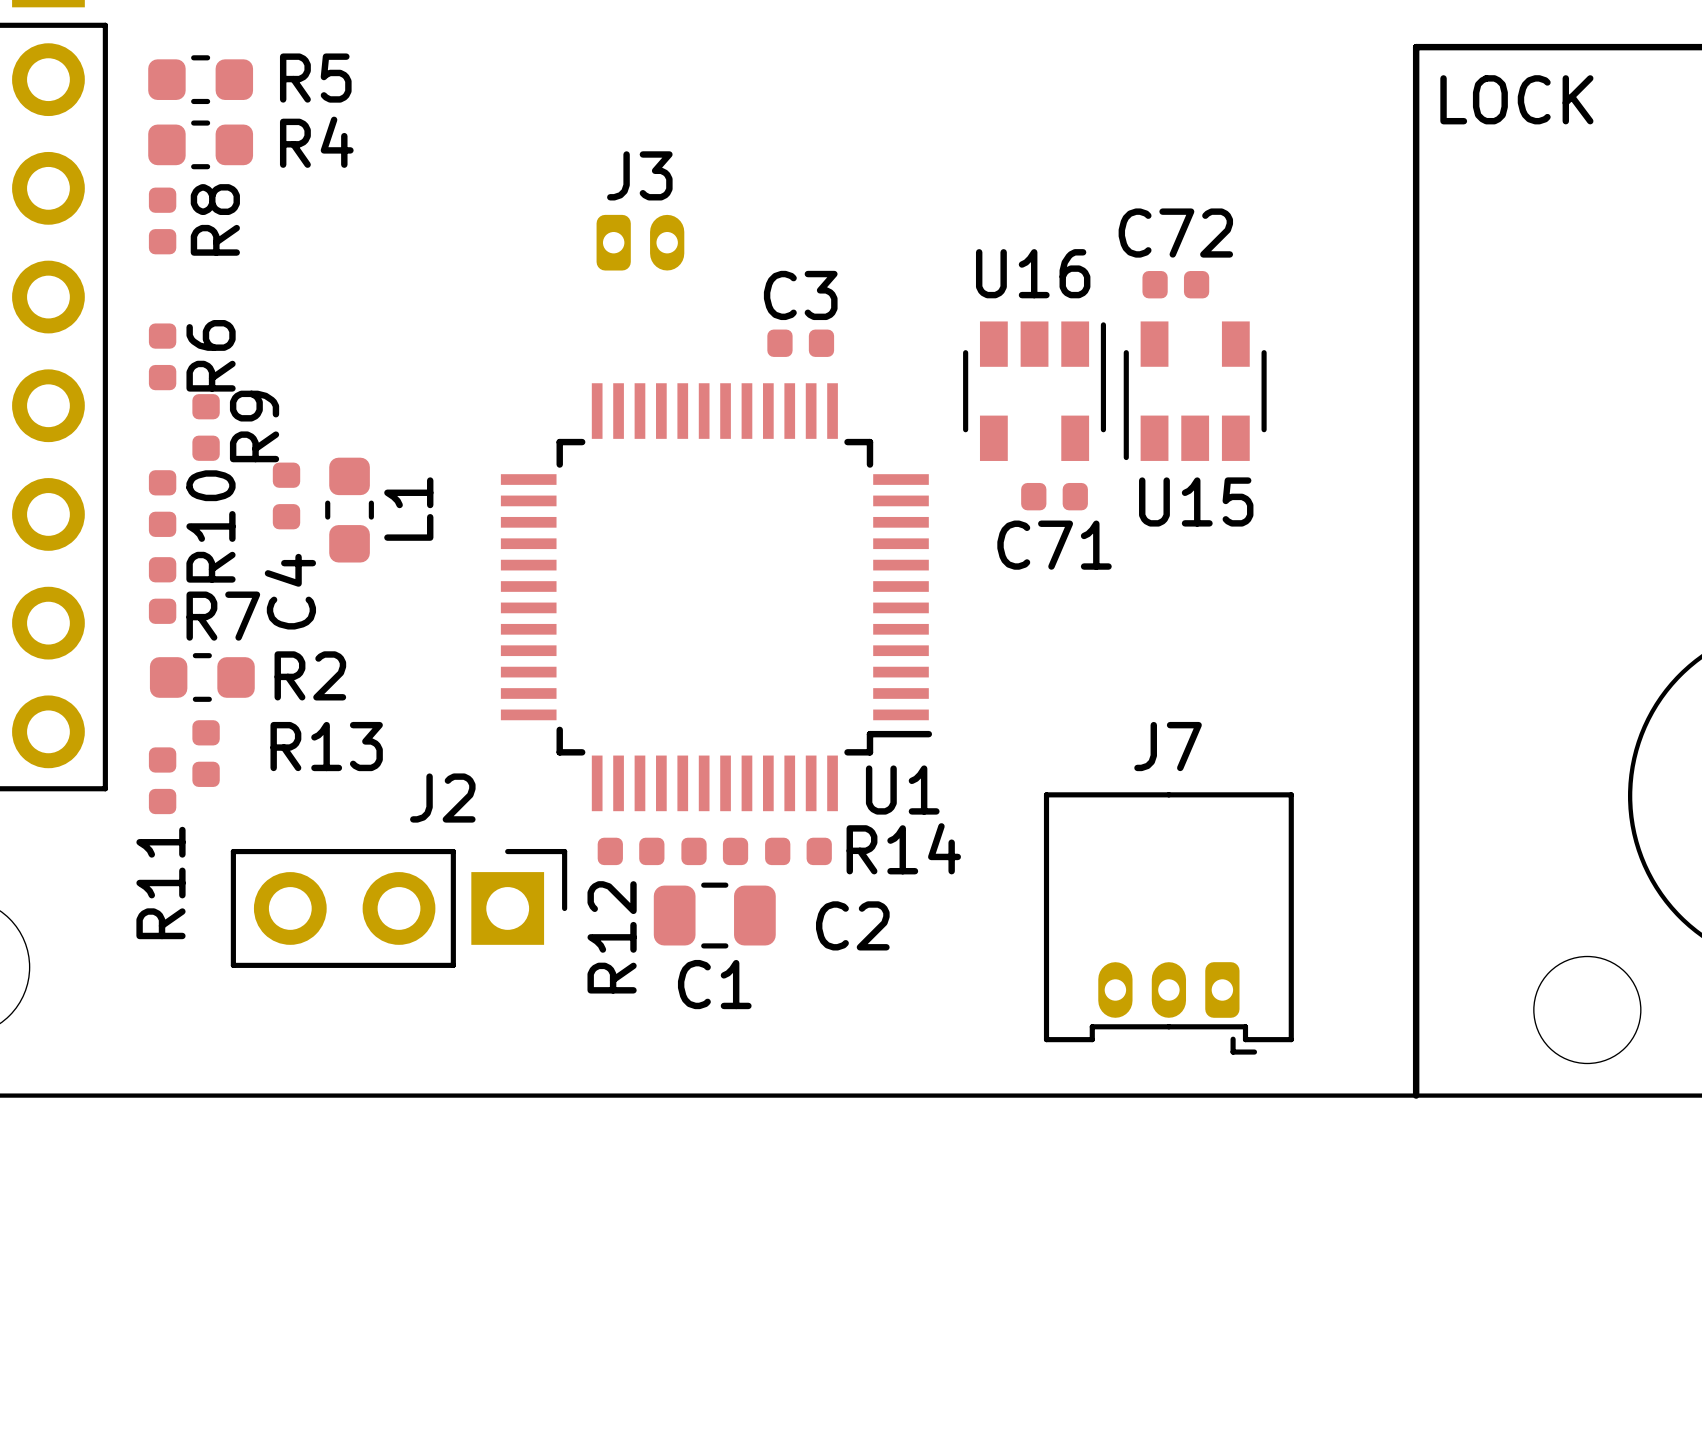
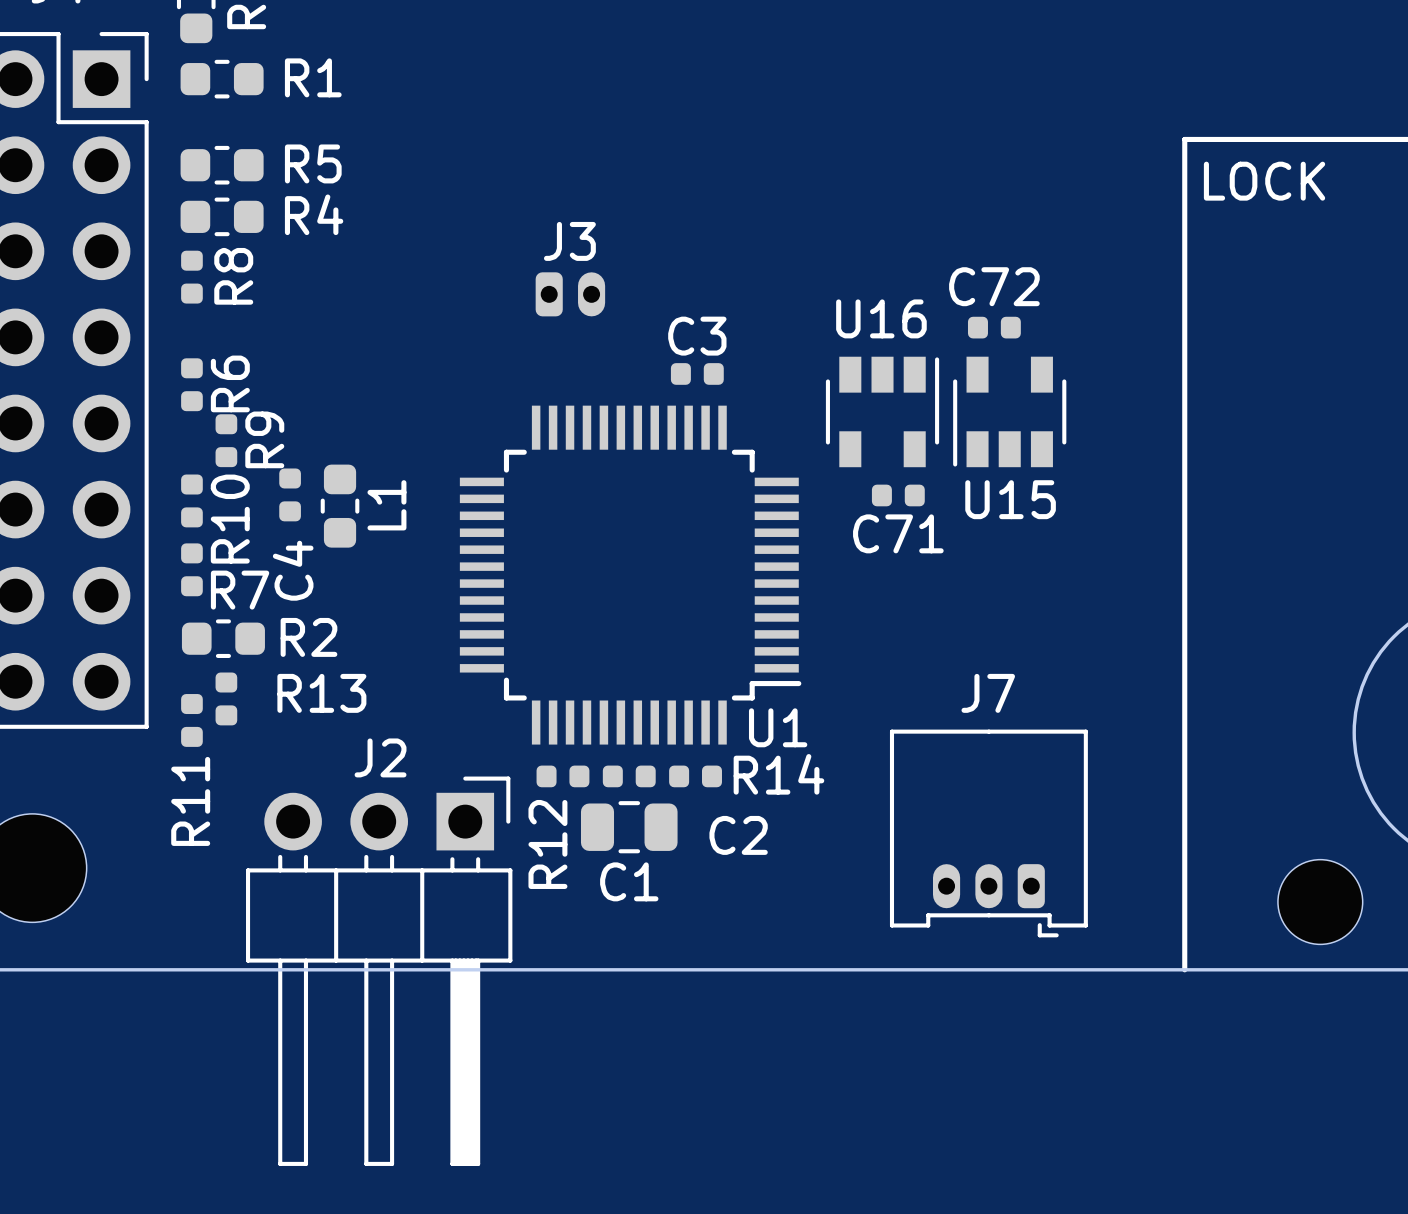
J2 name position: J2 (442, 798) -> J2 (380, 757)
J2 footprint: [230, 848, 568, 968] -> [245, 776, 513, 1166]

